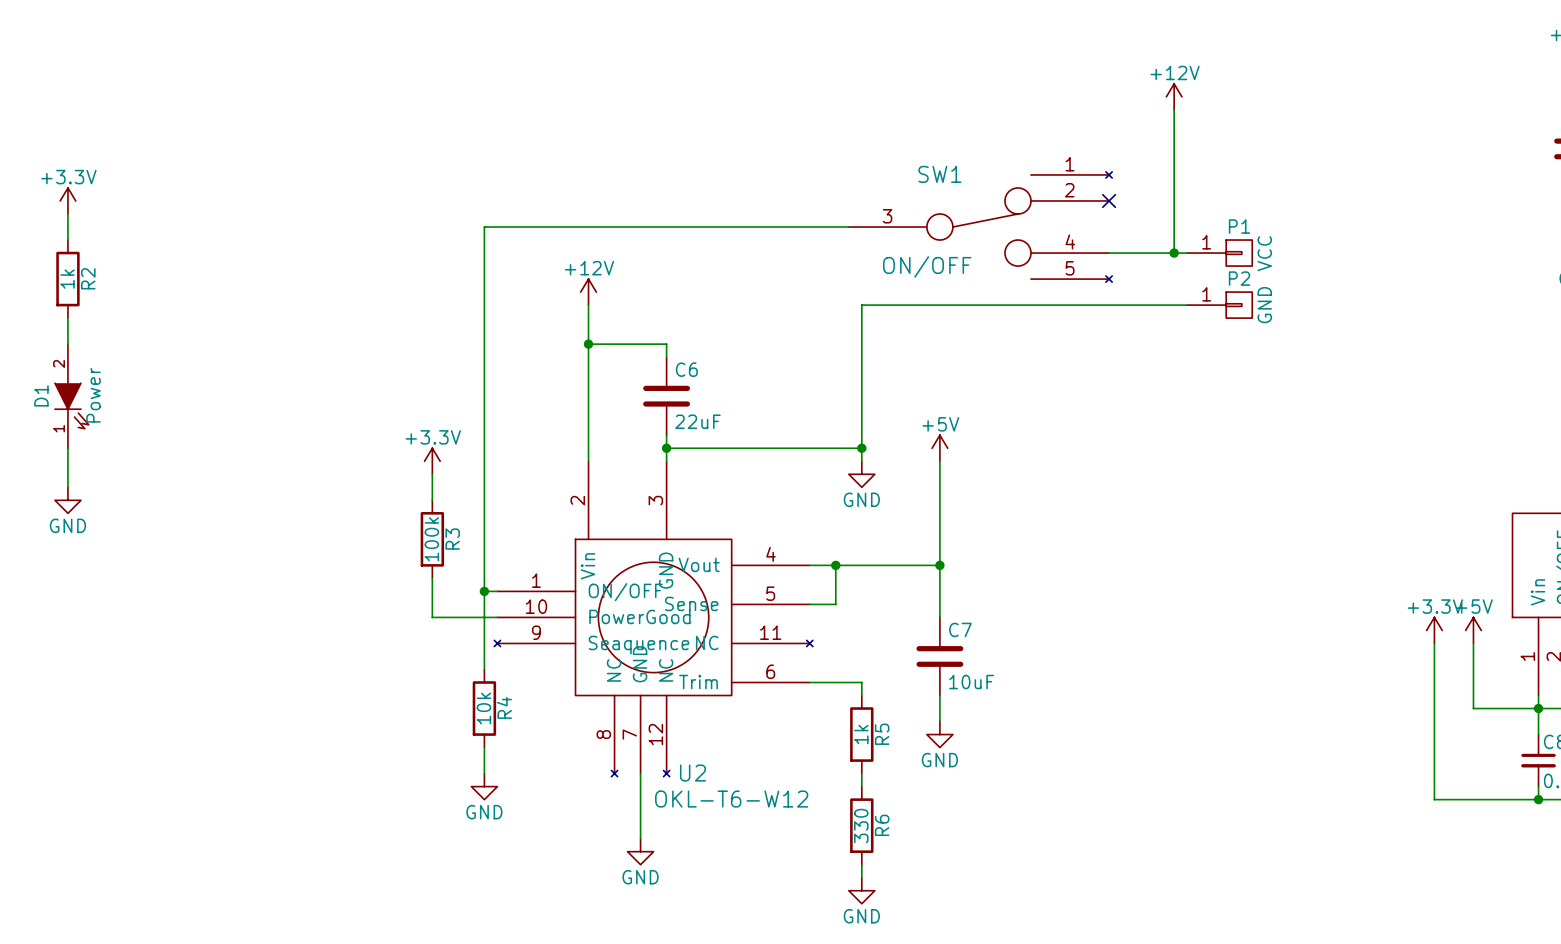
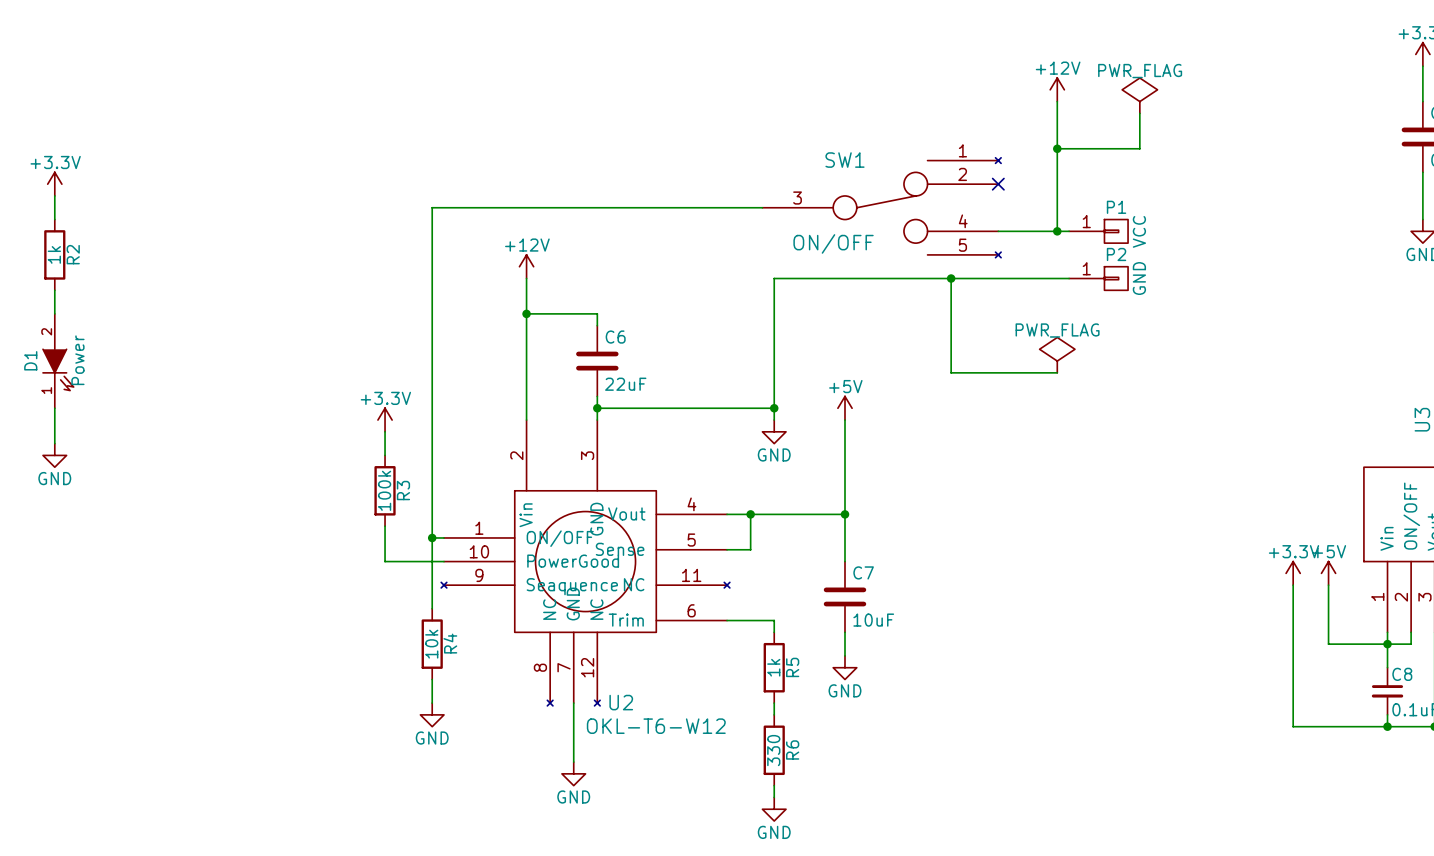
power symbol: none -> PWR_FLAG (1139, 95)
wire: none -> (1139, 113) (1139, 148) (1057, 148)
junction: none -> (1057, 148)
wire: none -> (951, 278) (951, 372) (1057, 372)
junction: none -> (951, 278)
power symbol: none -> PWR_FLAG (1057, 355)

